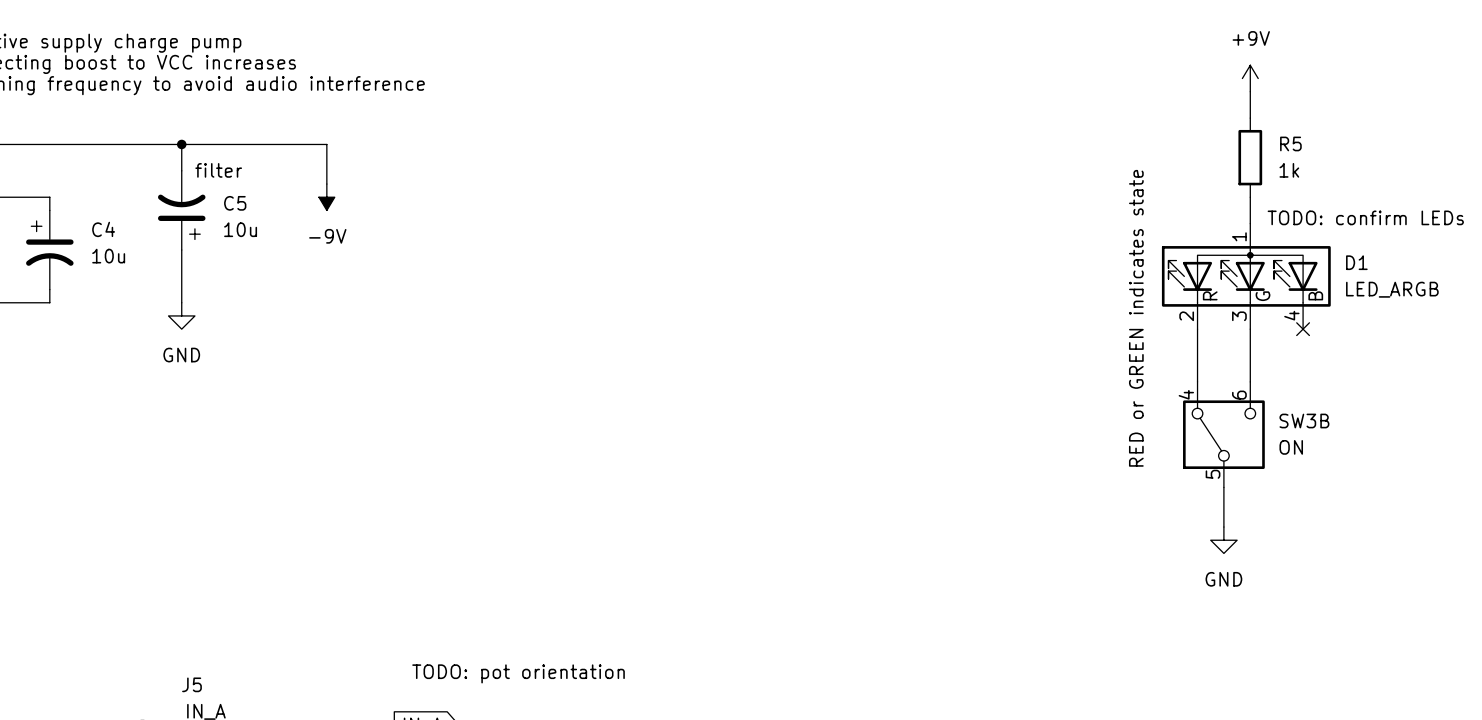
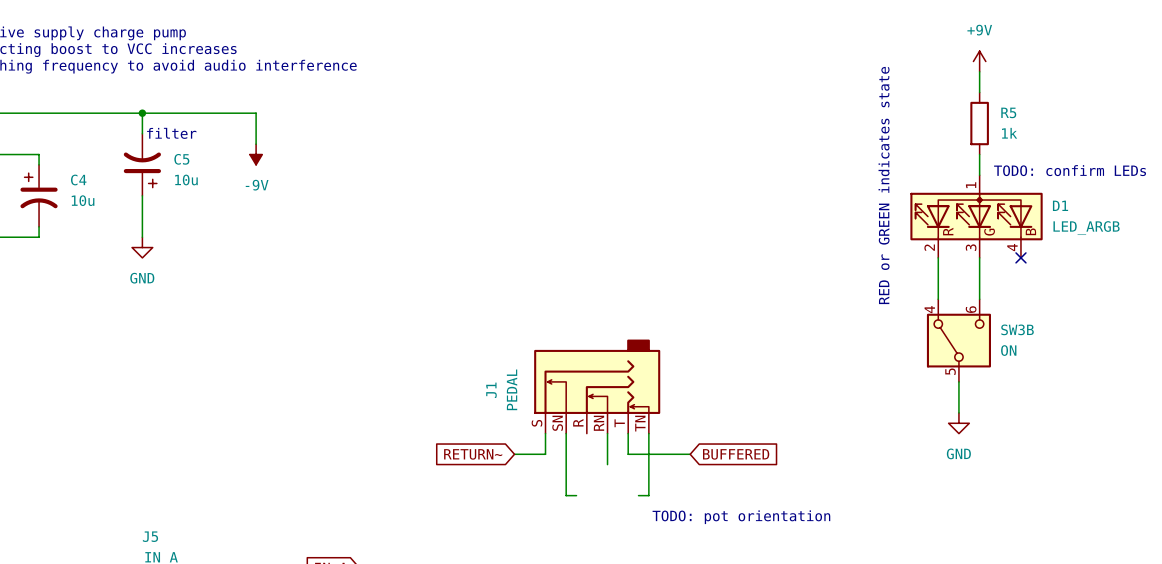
text position: RED or GREEN indicates state (1136, 318) -> RED or GREEN indicates state (884, 185)
J1: none -> PEDAL (597, 386)
wire: none -> (545, 433) (545, 454) (514, 454)
wire: none -> (566, 433) (566, 495) (576, 495)
wire: none -> (607, 433) (607, 464)
wire: none -> (628, 433) (628, 454) (690, 454)
wire: none -> (648, 433) (648, 495) (638, 495)
global label: none -> RETURN~ (473, 454)
global label: none -> BUFFERED (736, 454)
text: none -> TODO: pot orientation (741, 517)
text: TODO: pot orientation (518, 673) -> none

